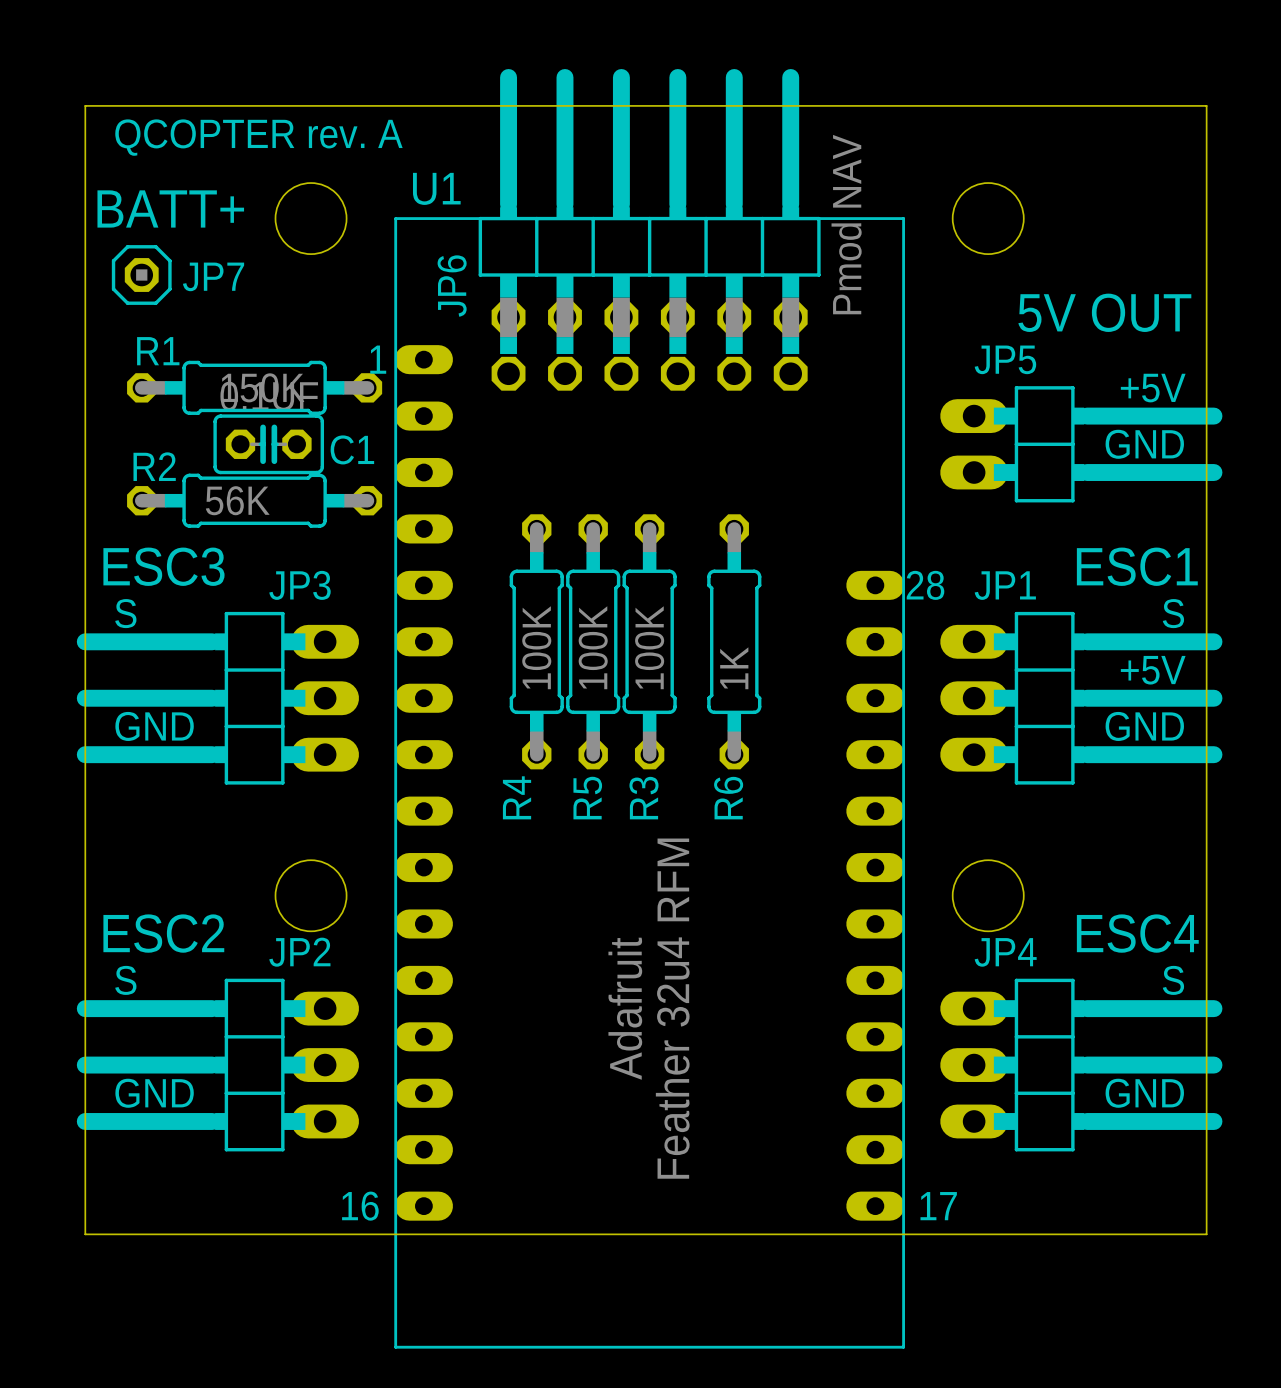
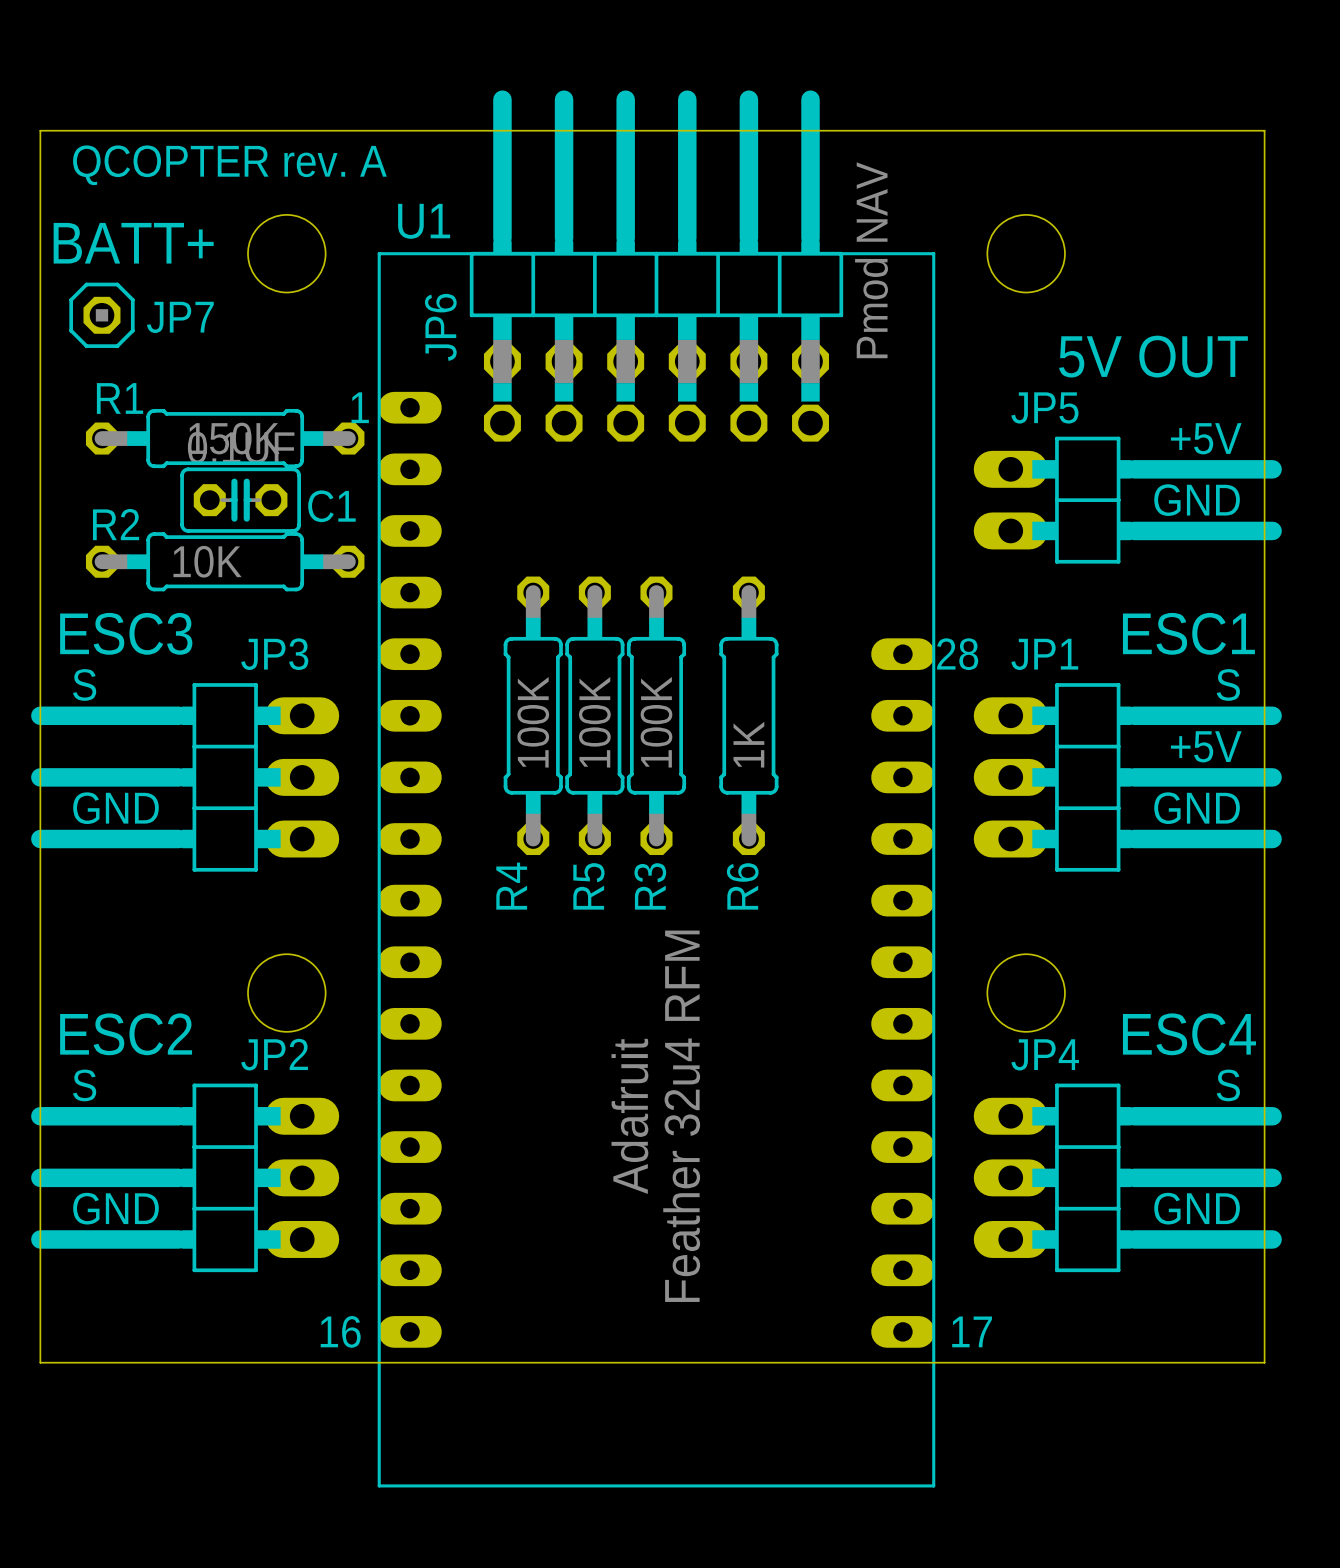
R2 value: 56K (237, 500) -> 10K (207, 561)

